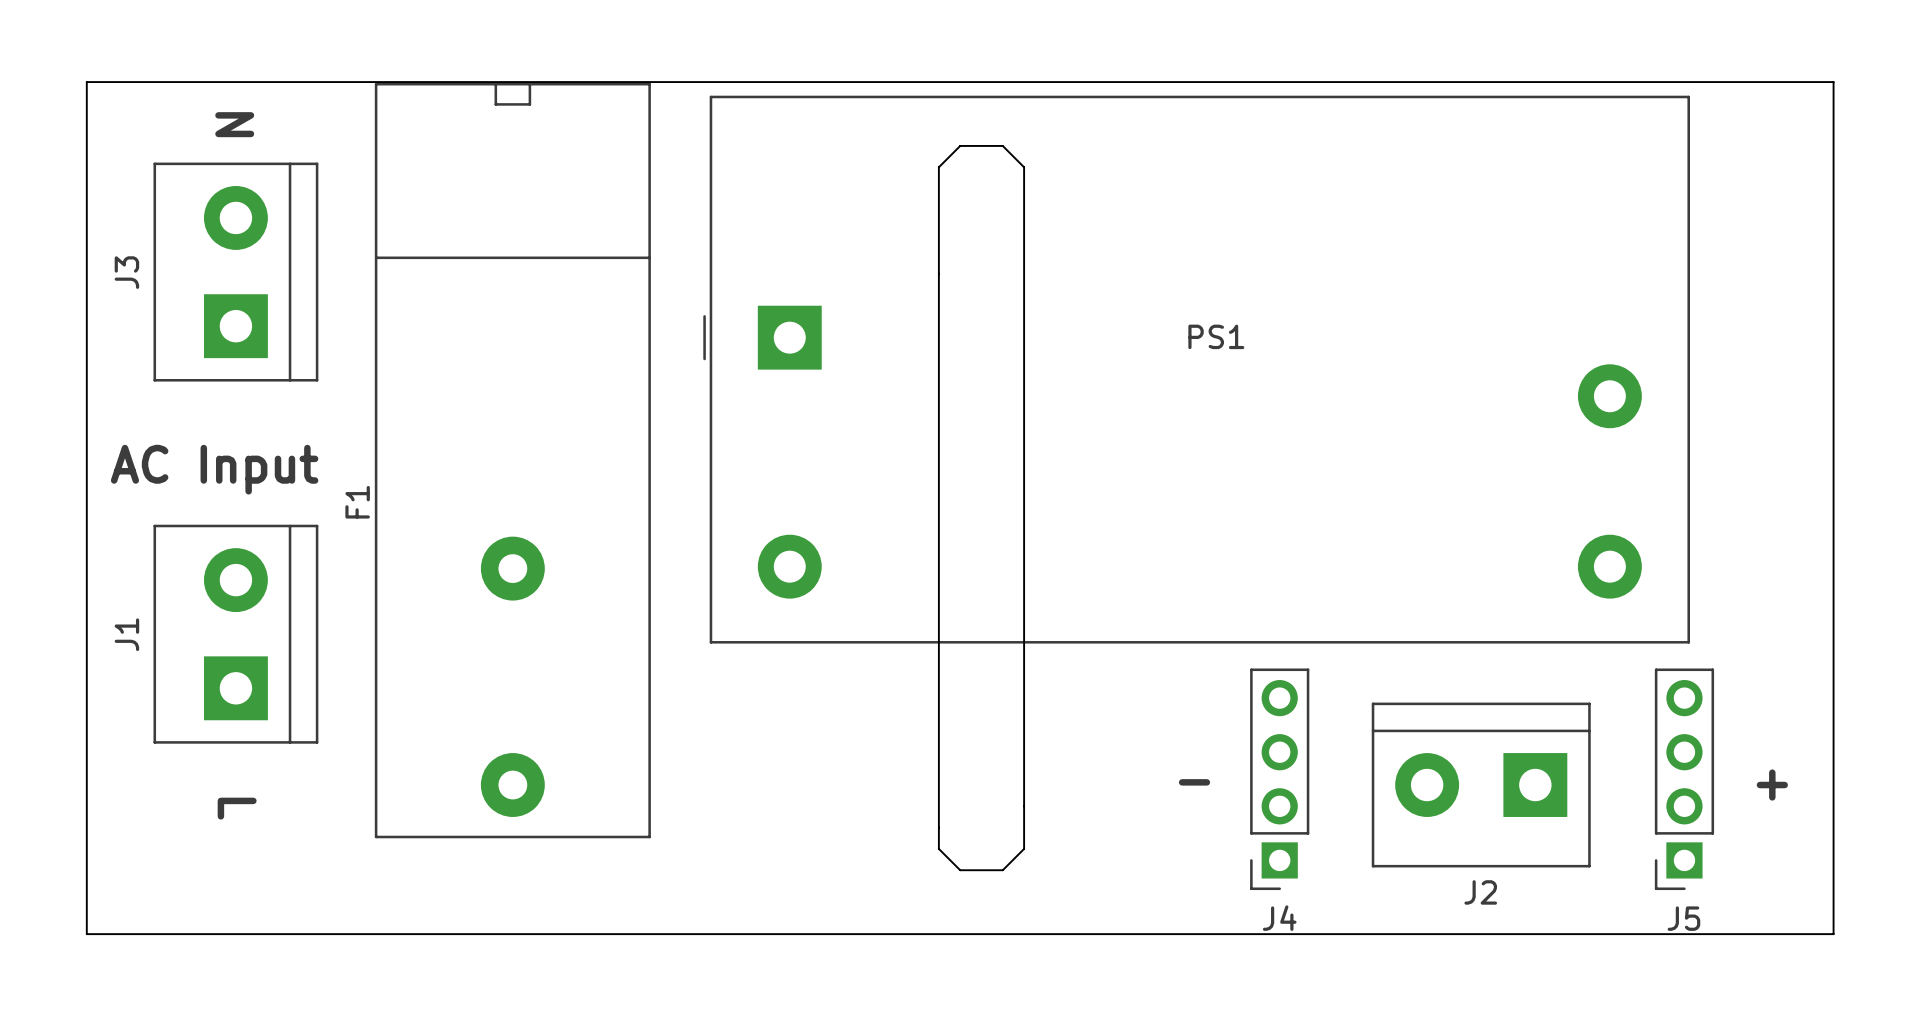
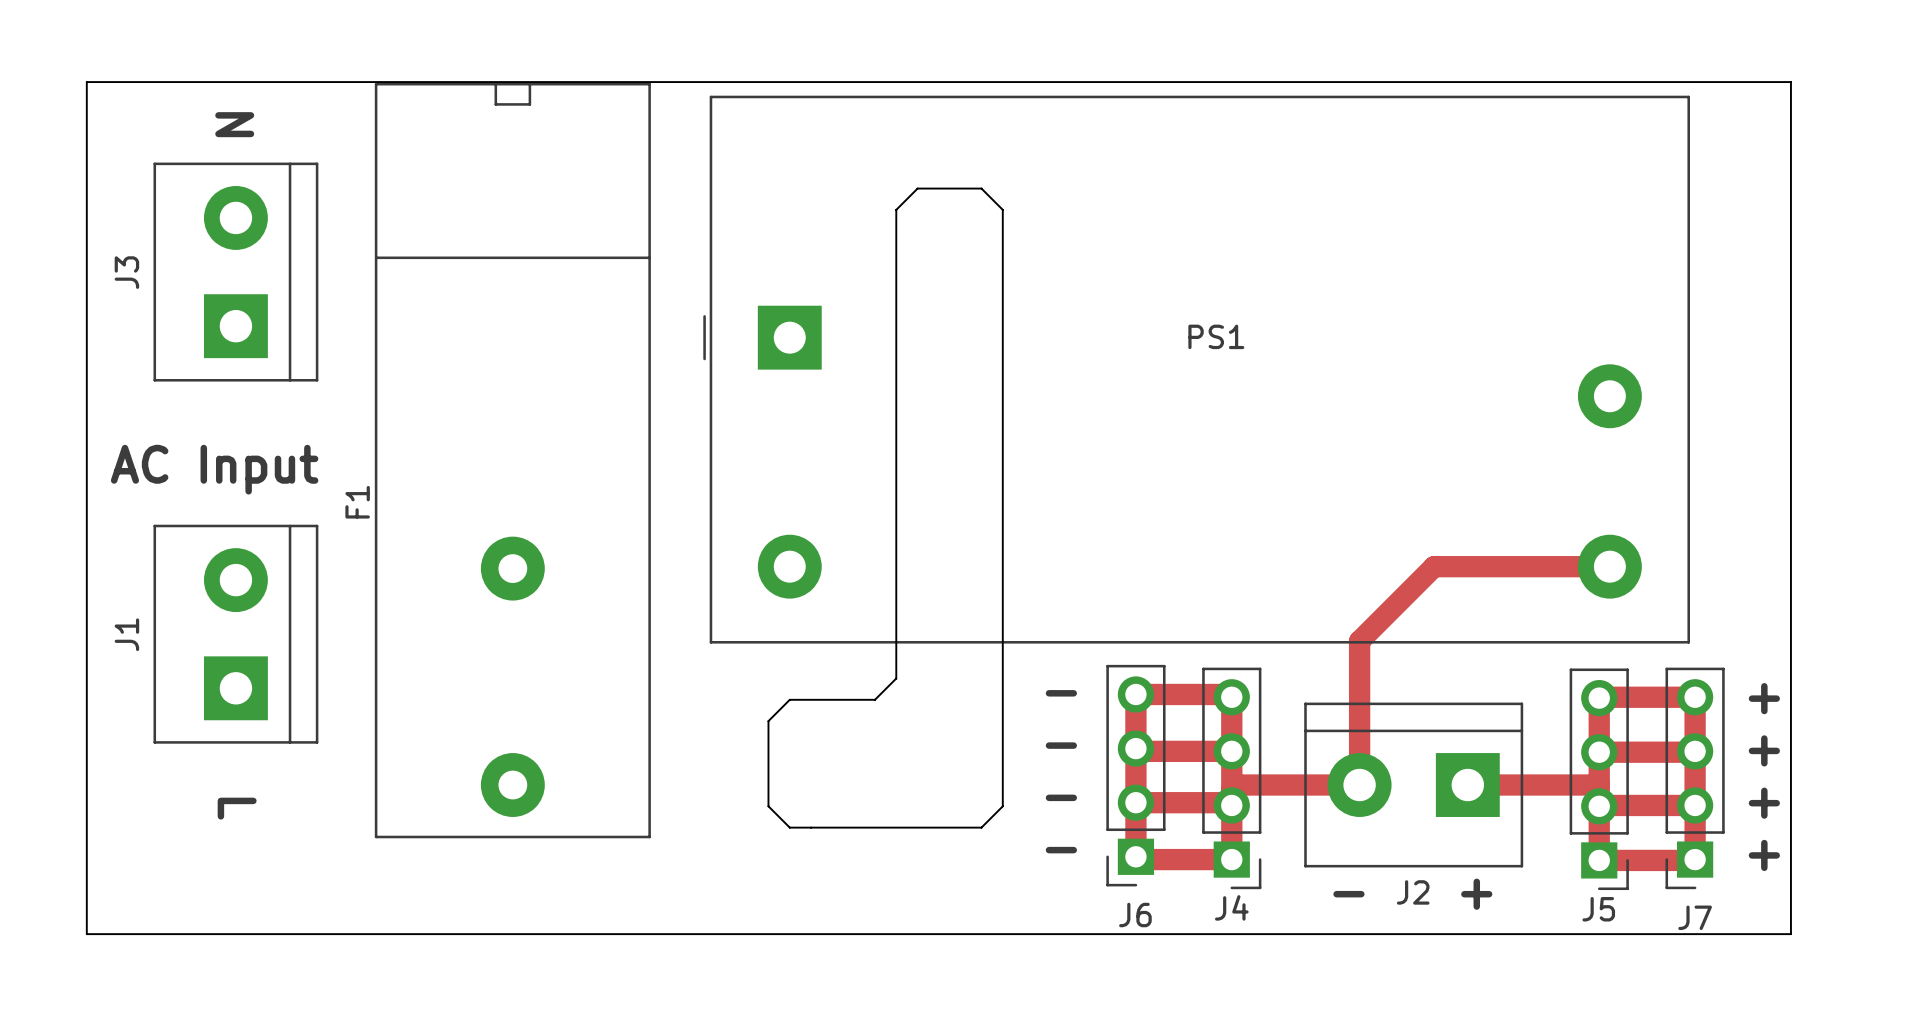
board edge: (1790, 82) (1833, 82) (1833, 934) (1790, 934) -> (1790, 82) (1790, 934)
board edge: (960, 145) (1002, 145) (1024, 167) (1024, 848) (1002, 870) (960, 870) (938, 848) (938, 167) (960, 145) -> none
board edge: none -> (917, 188) (981, 188) (1002, 209) (1002, 806) (981, 827) (789, 827) (768, 806) (768, 721) (789, 699) (874, 699) (896, 678) (896, 209) (917, 188)
track: none -> (1609, 566) (1434, 566) (1359, 641) (1359, 785) (1237, 785) (1231, 790)
J4 footprint: [1250, 668, 1310, 891] -> [1202, 667, 1262, 890]
J5 footprint: [1654, 668, 1715, 891] -> [1569, 668, 1629, 891]
text: none -> - (1061, 693)
track: none -> (1135, 694) (1229, 694) (1231, 697) (1231, 859) (1138, 859) (1135, 856) (1135, 694)
track: none -> (1600, 697) (1599, 860) (1694, 860) (1695, 697) (1600, 697)
text: none -> + (1764, 698)
text: none -> - (1061, 745)
track: none -> (1135, 748) (1138, 751) (1231, 751)
text: none -> + (1764, 750)
track: none -> (1695, 751) (1599, 752)
J6: none -> (1135, 775)
J7: none -> (1695, 778)
text: - (1194, 782) -> none
track: none -> (1467, 785) (1599, 785)
J2 position: (1481, 785) -> (1413, 785)
text: + (1772, 785) -> none
text: none -> - (1061, 797)
track: none -> (1135, 802) (1229, 802) (1231, 805)
text: none -> + (1764, 803)
track: none -> (1695, 805) (1599, 806)
text: none -> - (1061, 850)
text: none -> + (1764, 855)
text: none -> - (1348, 894)
text: none -> + (1476, 894)

